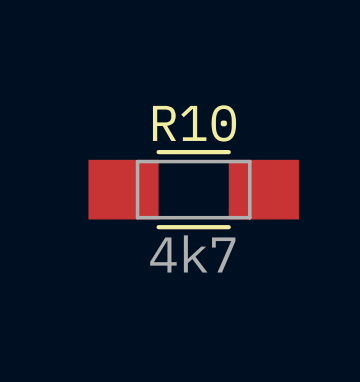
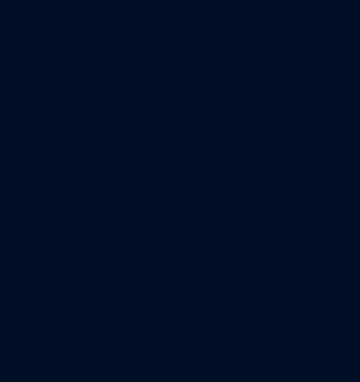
R10: 4k7 (193, 189) -> none

